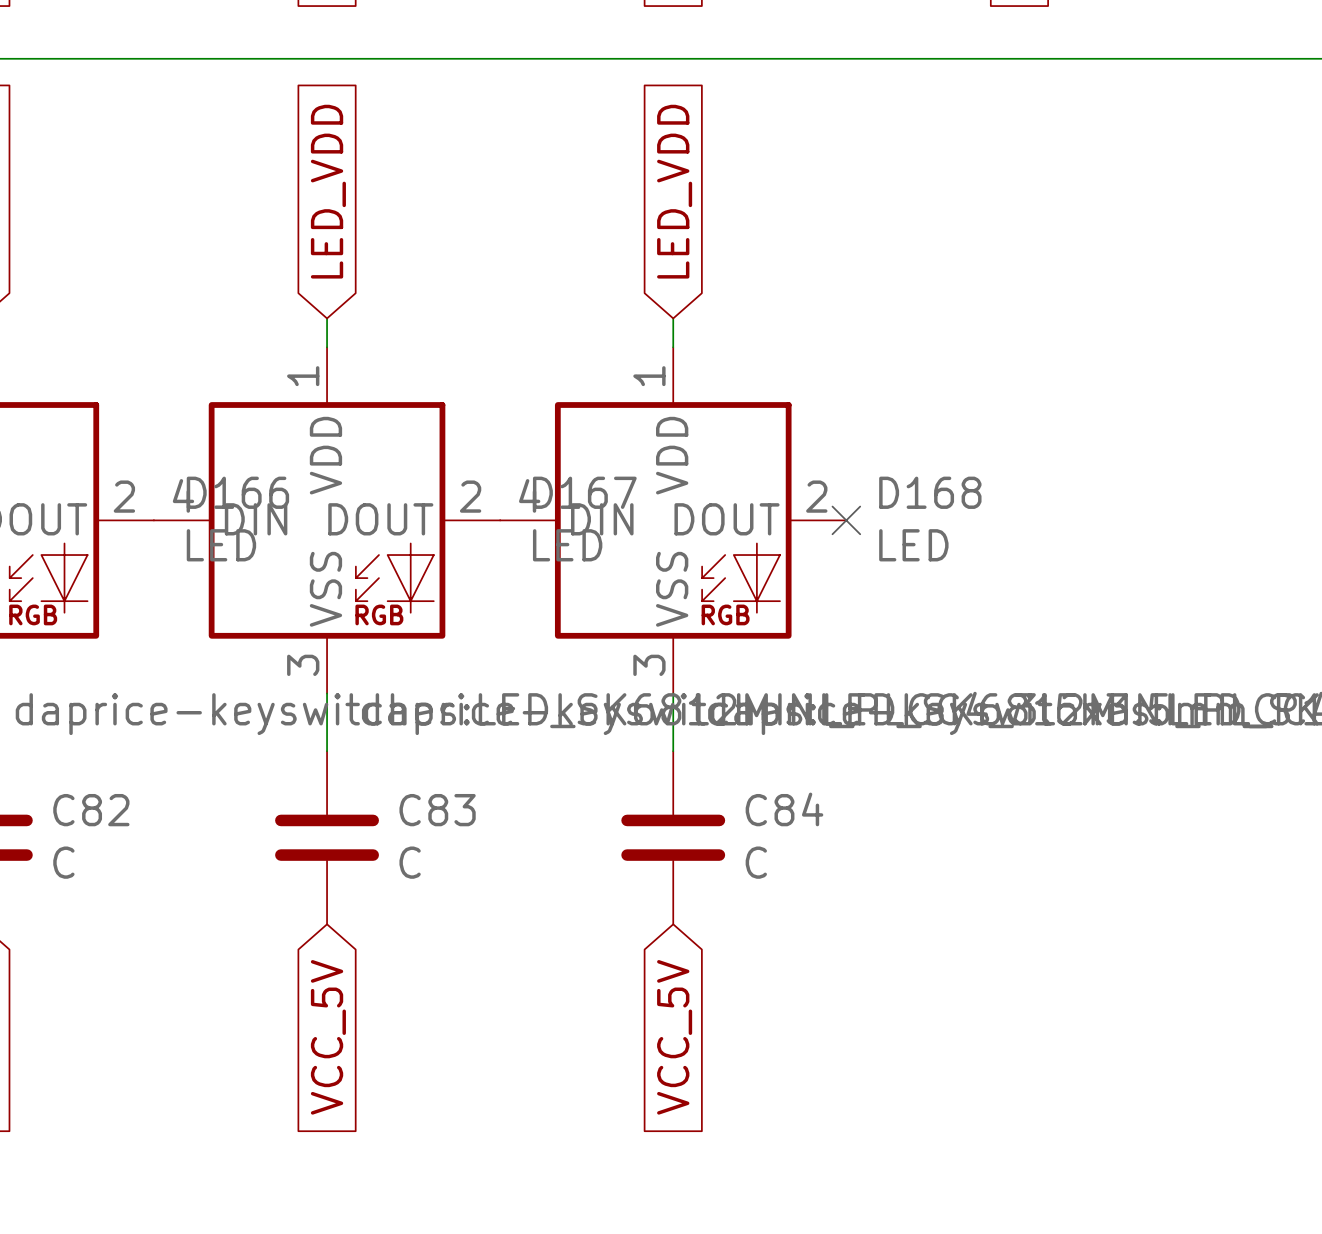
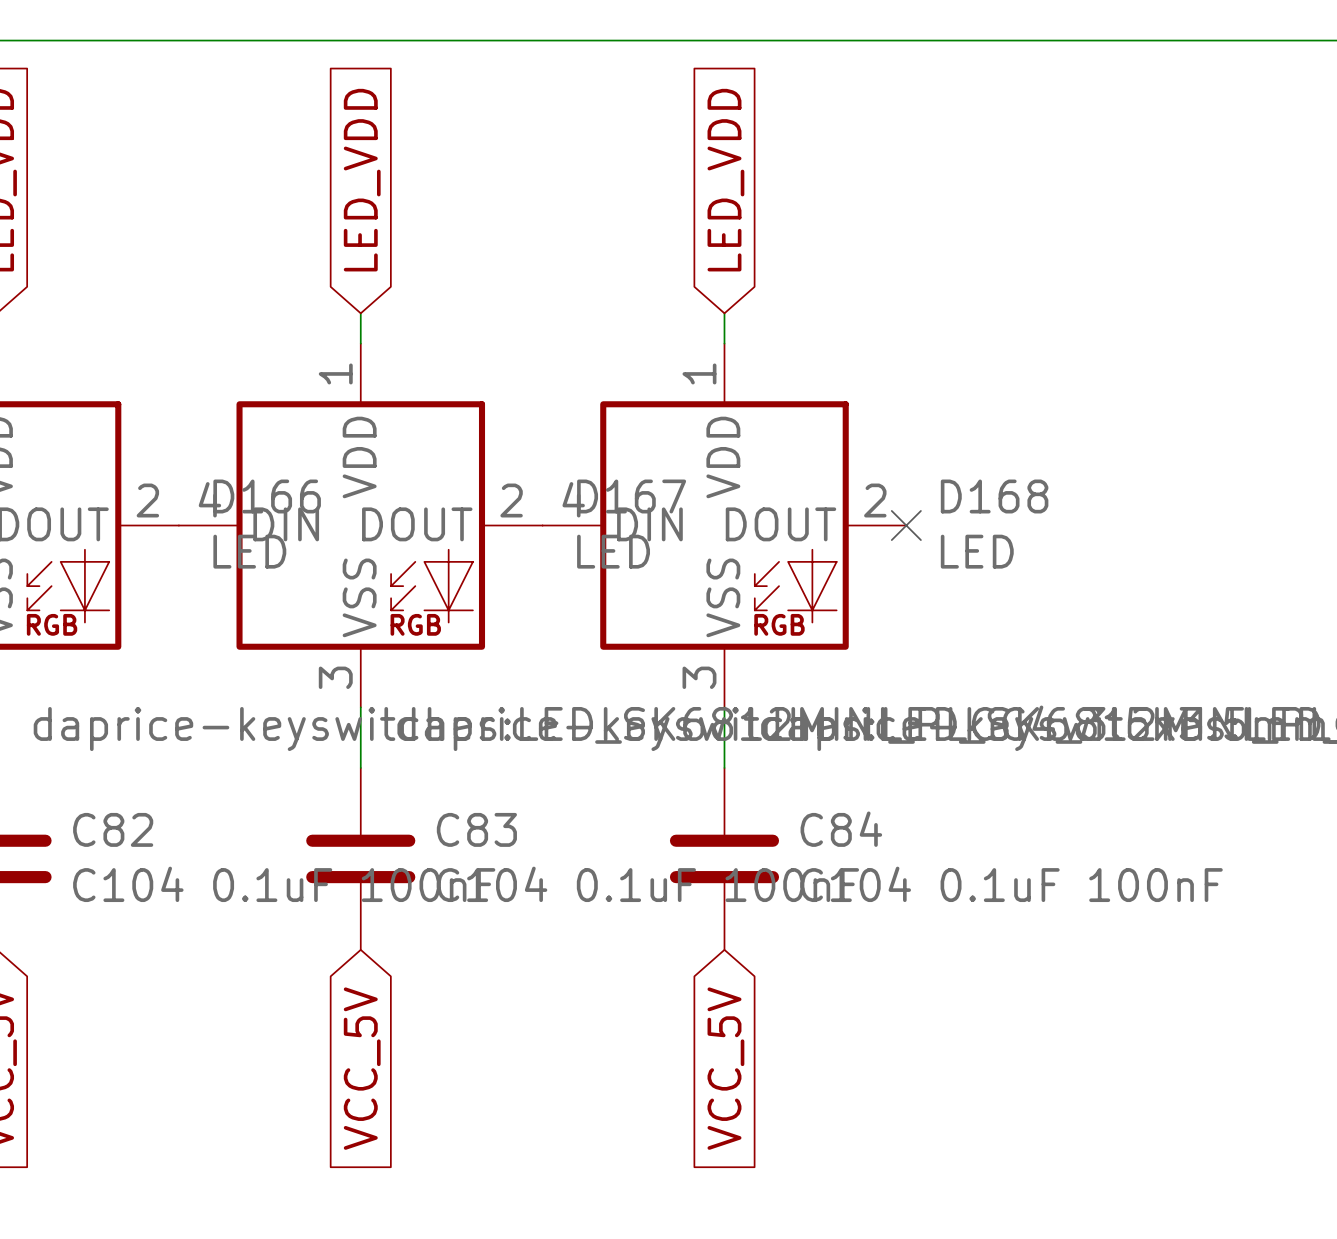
C82 value: C (63, 862) -> C104 0.1uF 100nF (284, 884)
C83 value: C (410, 862) -> C104 0.1uF 100nF (647, 884)
C84 value: C (756, 862) -> C104 0.1uF 100nF (1011, 884)

